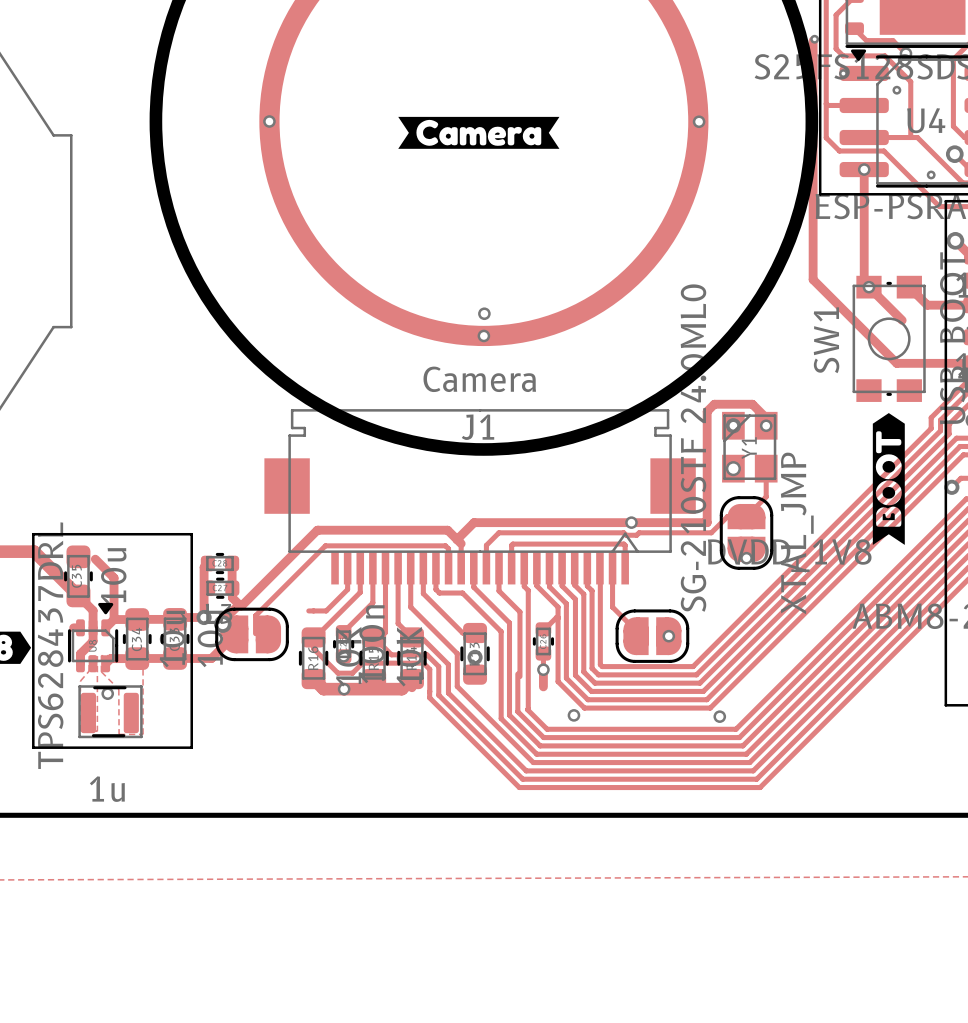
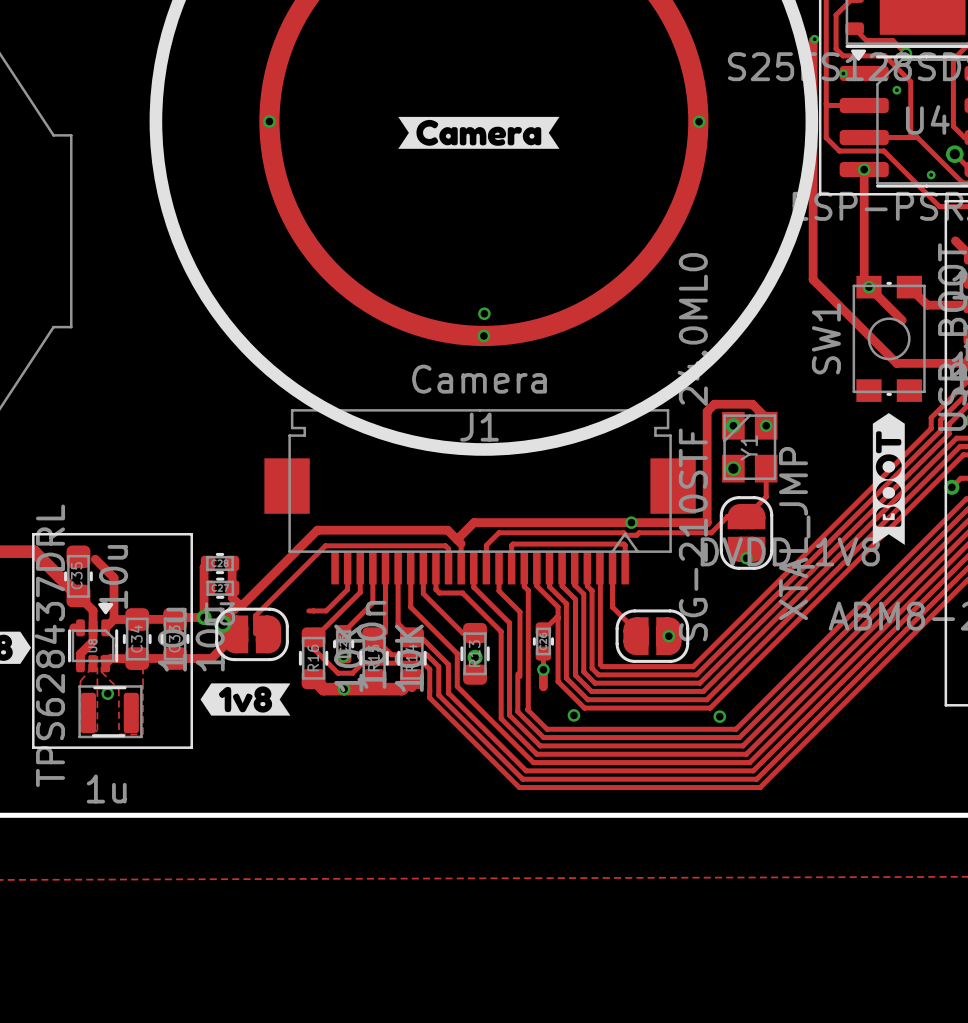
via: (955, 240) -> none
drawing: none -> [200, 683, 291, 716]

